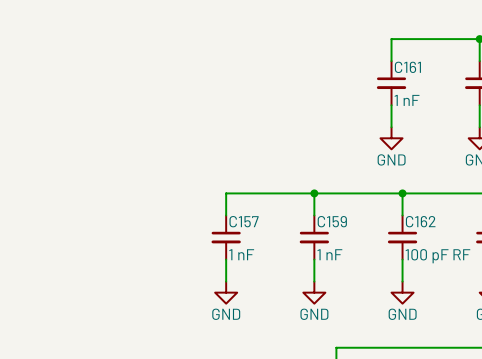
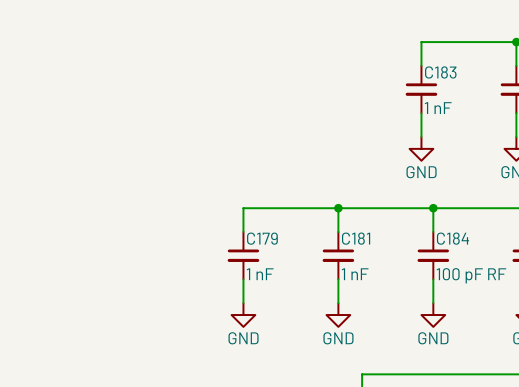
C161 name: C161 (407, 67) -> C183 (440, 72)
C157 name: C157 (244, 221) -> C179 (262, 238)
C159 name: C159 (332, 221) -> C181 (356, 238)
C162 name: C162 (420, 221) -> C184 (452, 238)

